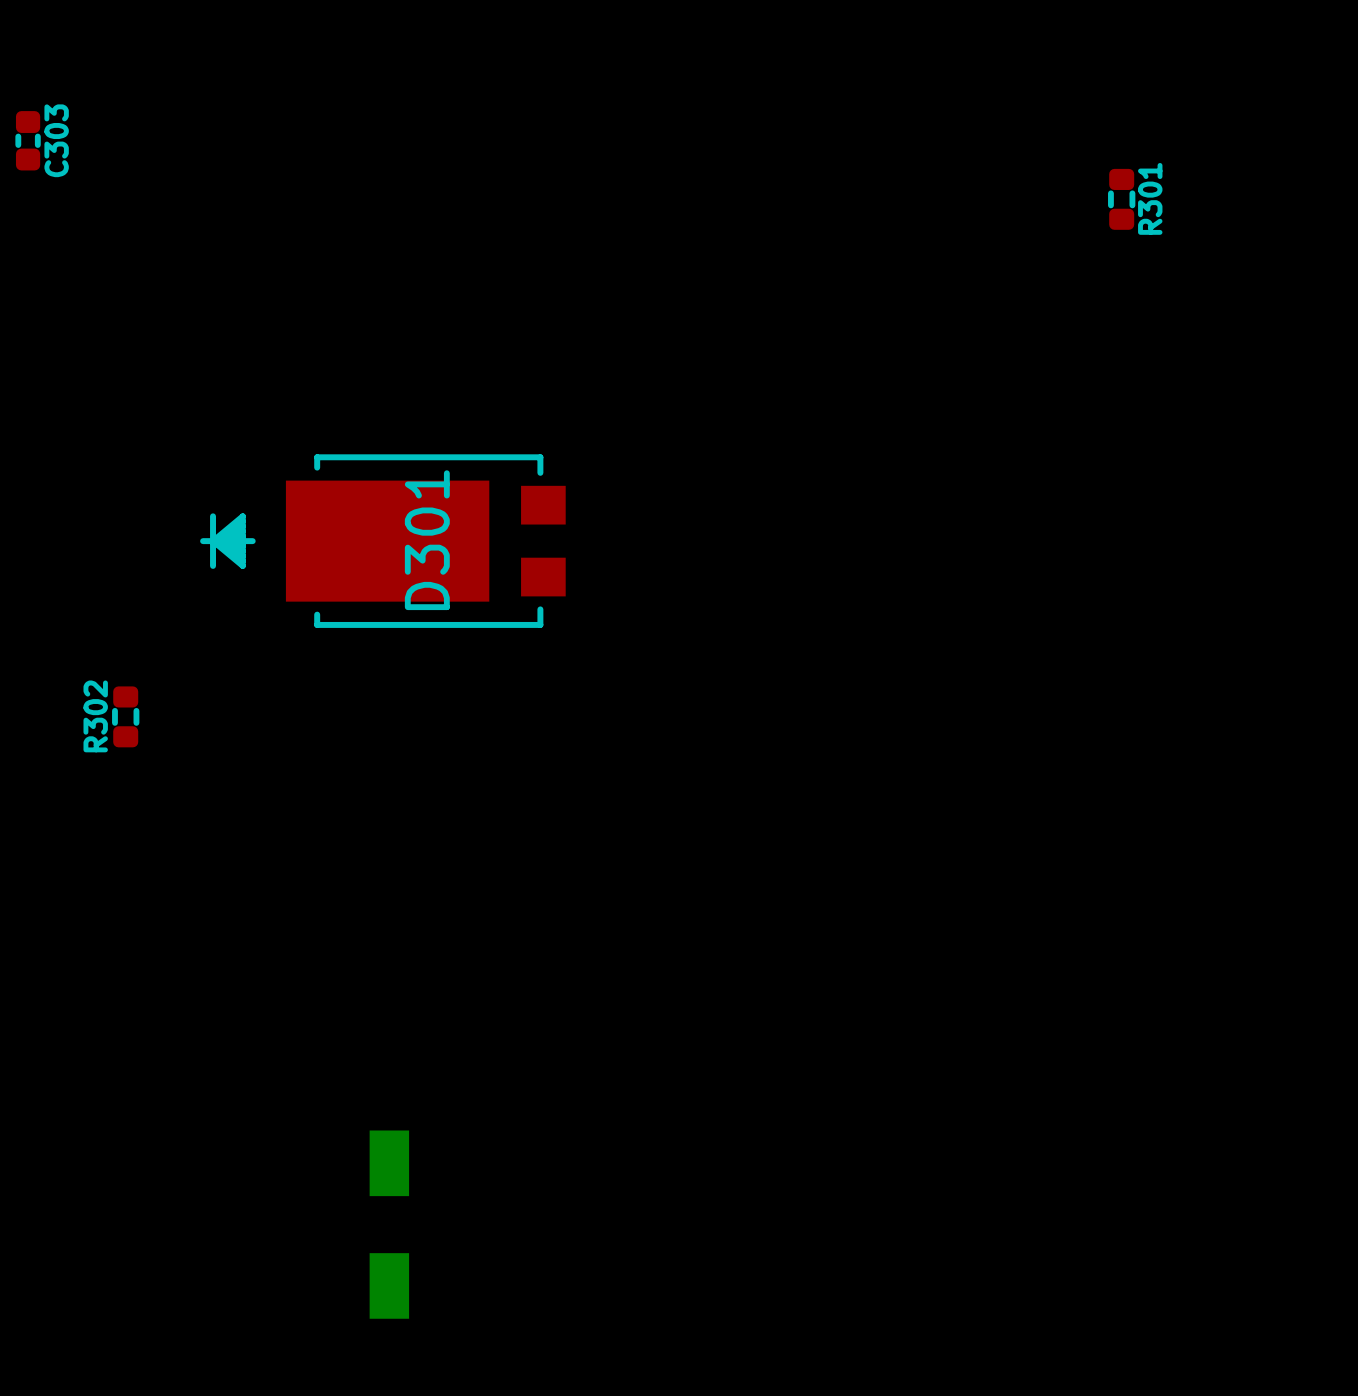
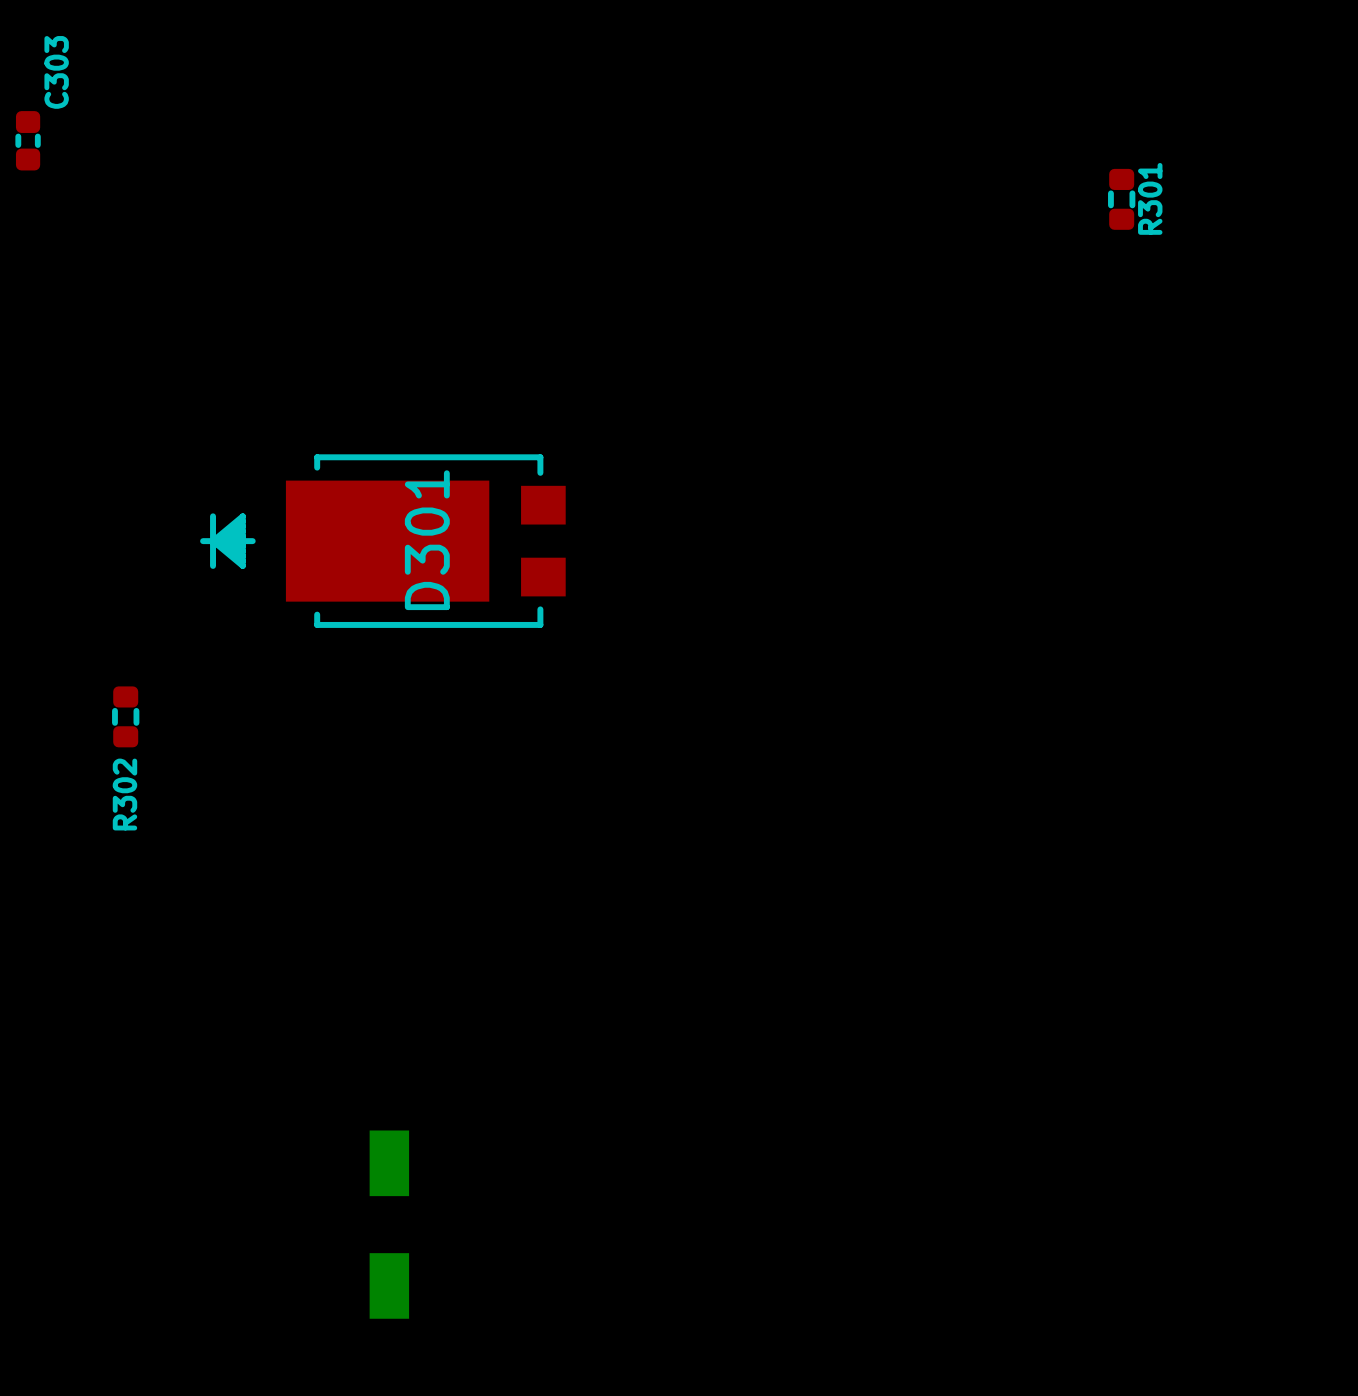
C303 name position: C303 (56, 140) -> C303 (56, 72)
R302 name position: R302 (95, 716) -> R302 (124, 794)

